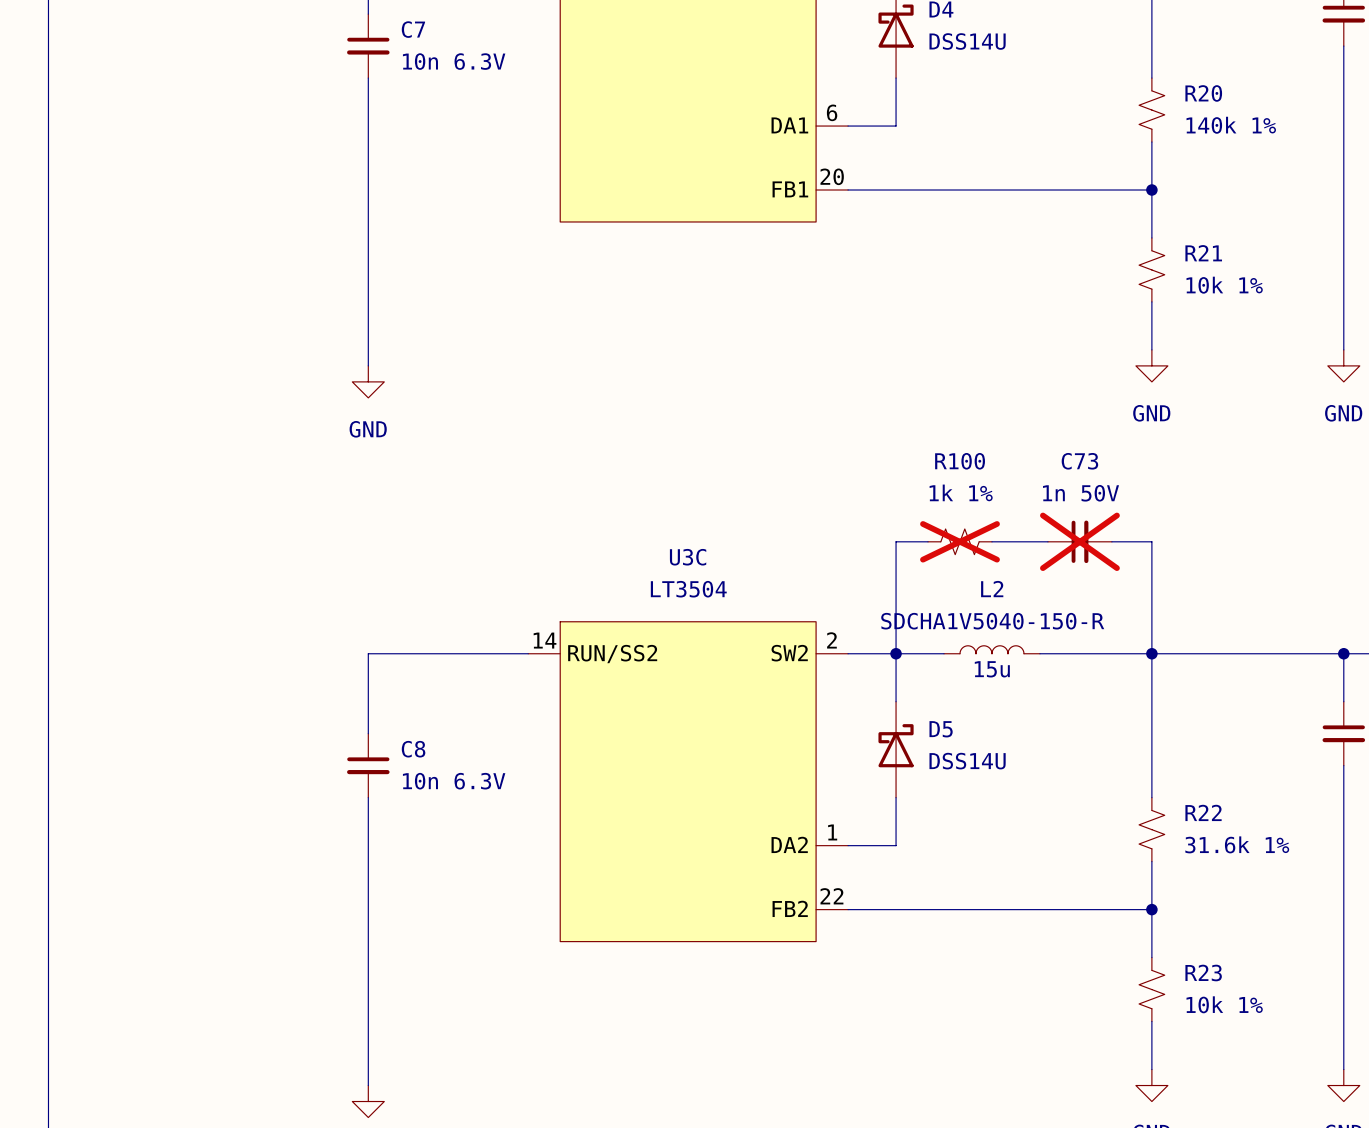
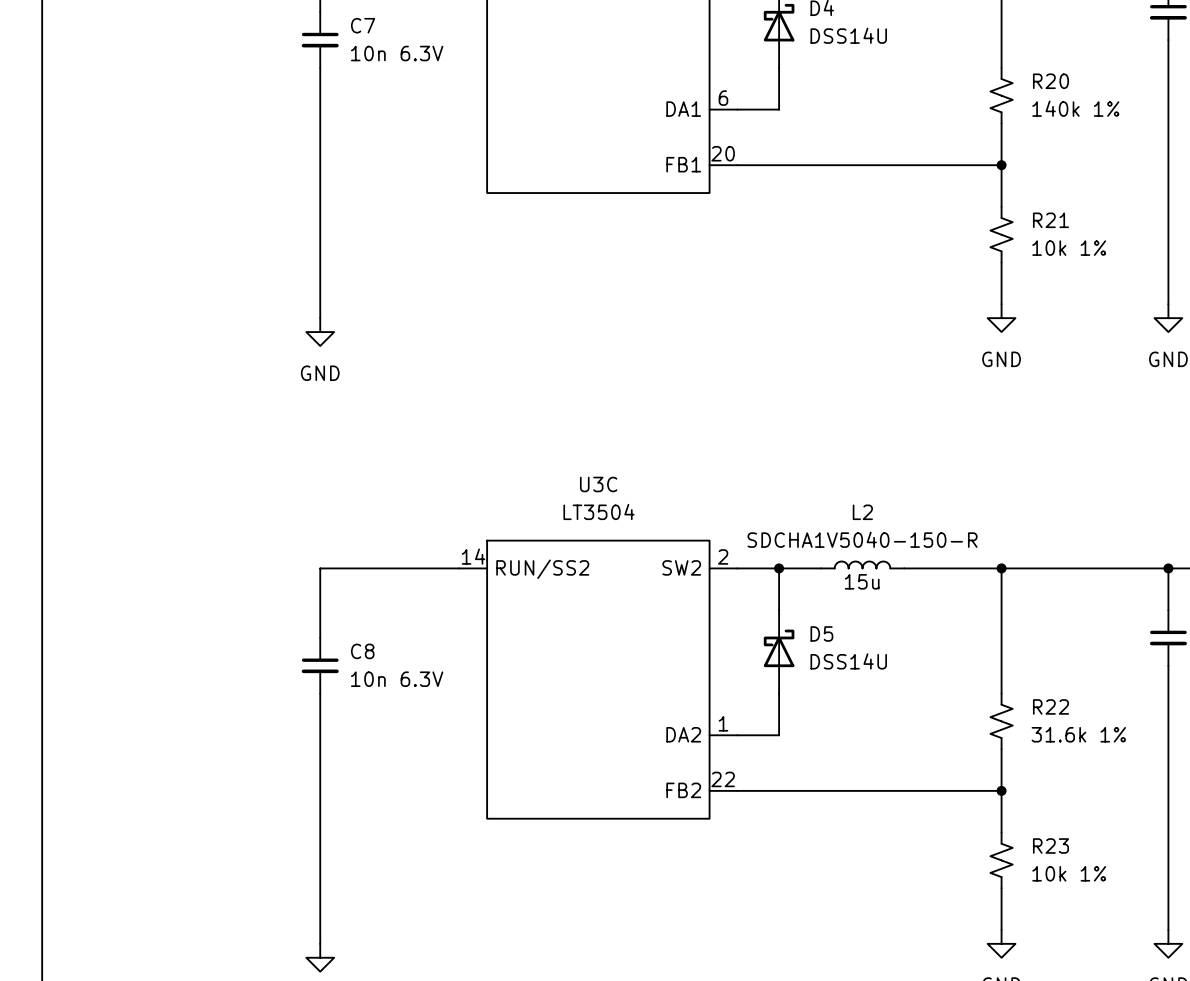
wire: (928, 541) (896, 541) (896, 653) -> none
R100: 1k 1% (960, 541) -> none
wire: (991, 541) (1047, 541) -> none
C73: 1n 50V (1079, 541) -> none
wire: (1111, 541) (1151, 541) (1151, 653) -> none

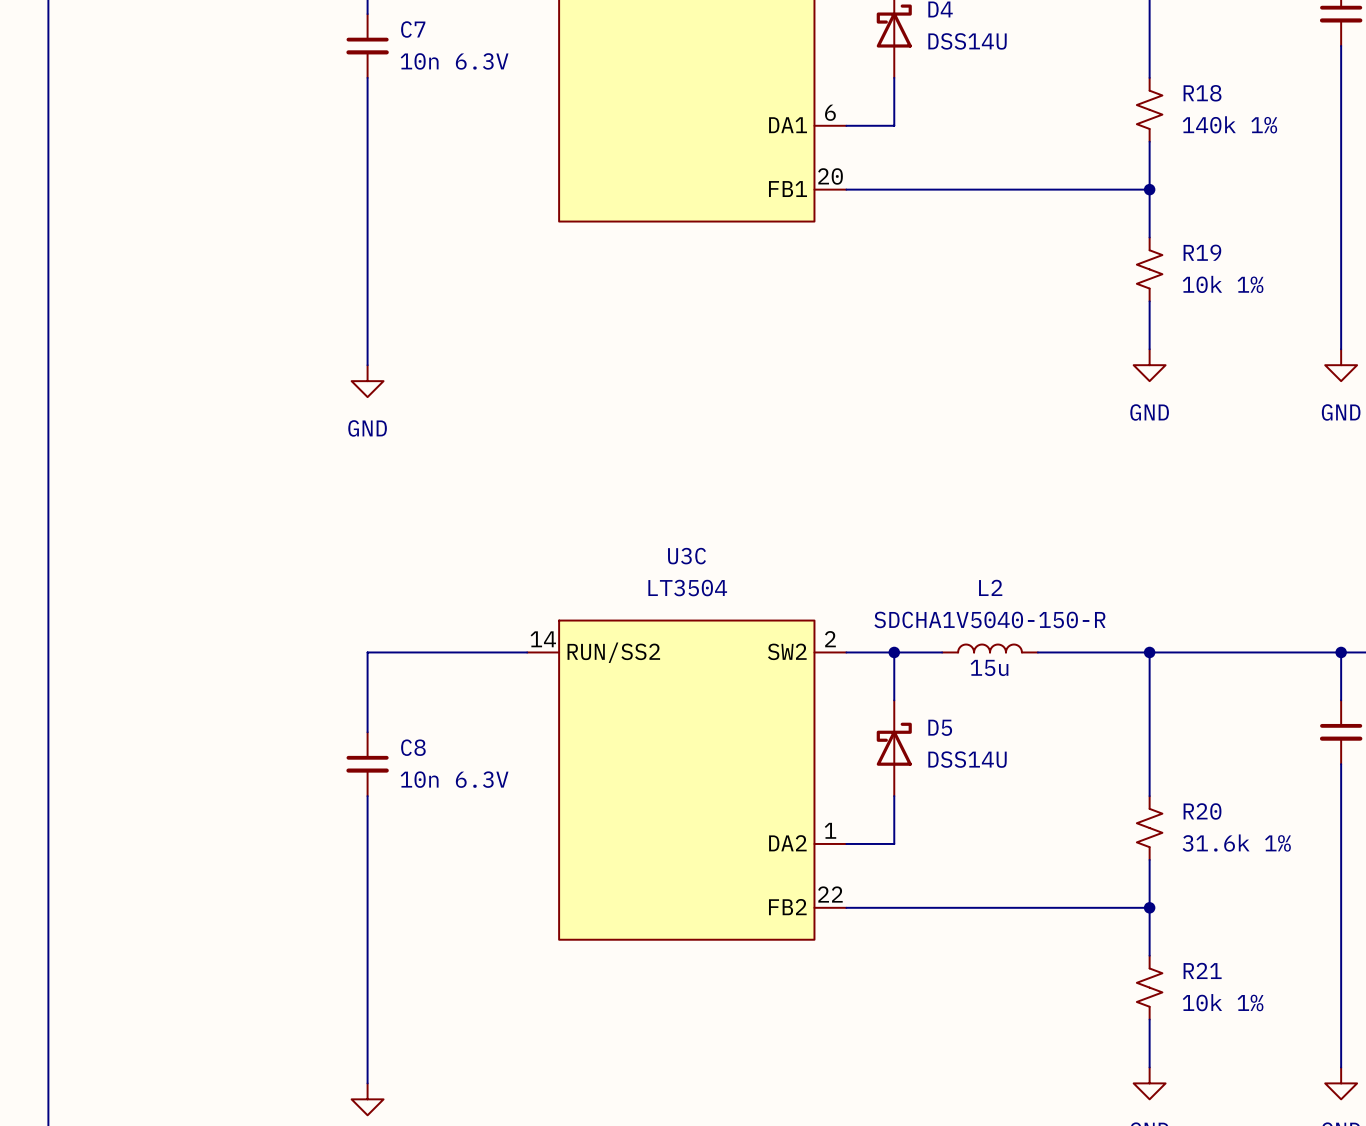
R20 name: R20 (1051, 81) -> R18 (1202, 93)
R21 name: R21 (1051, 220) -> R19 (1202, 252)
R22 name: R22 (1051, 706) -> R20 (1202, 811)
R23 name: R23 (1051, 846) -> R21 (1202, 970)

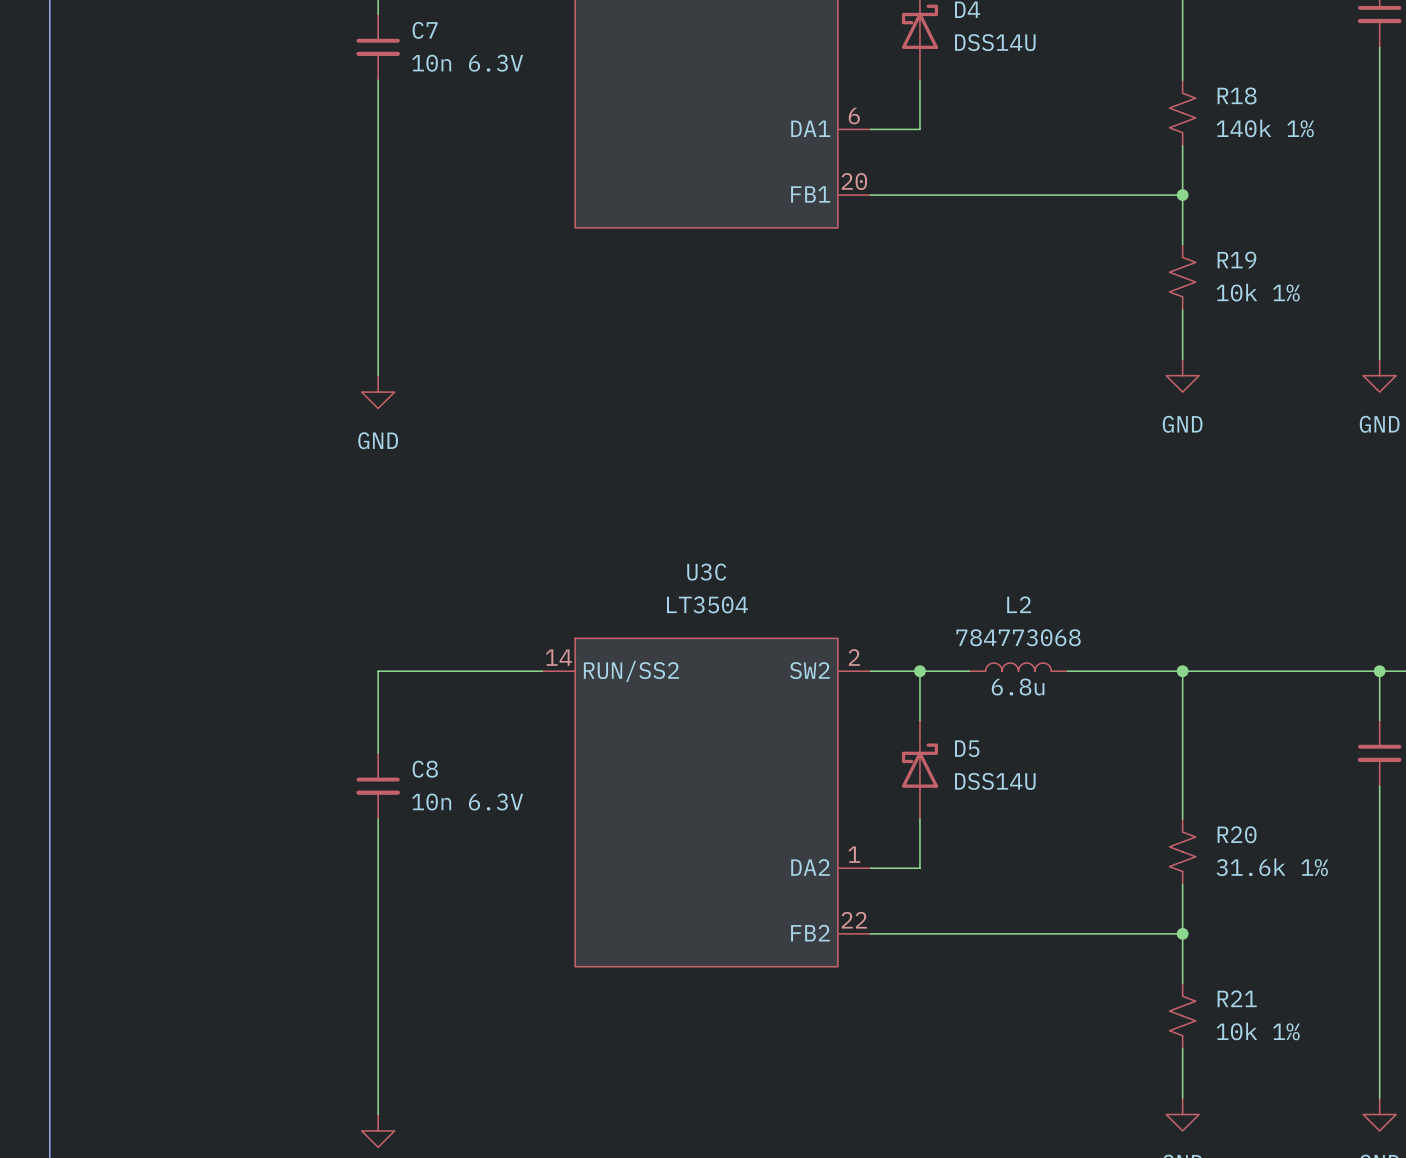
L2 value: SDCHA1V5040-150-R (989, 619) -> 784773068 (1018, 637)
L2 text: 15u (989, 667) -> 6.8u (1018, 687)

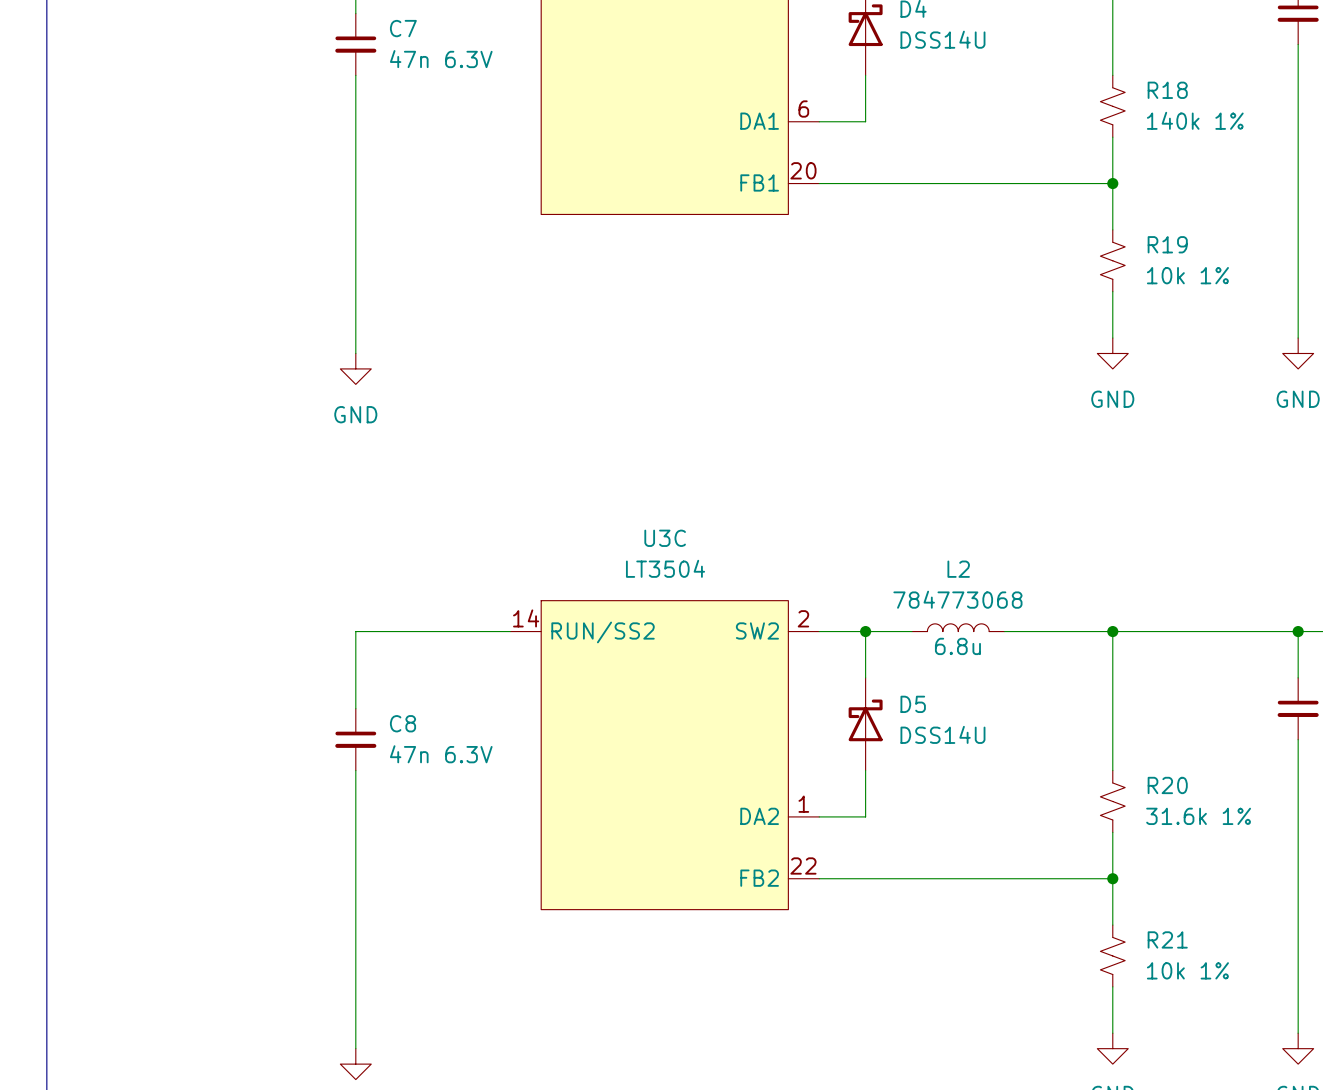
C7 value: 10n 6.3V (467, 63) -> 47n 6.3V (441, 59)
C8 value: 10n 6.3V (467, 802) -> 47n 6.3V (441, 754)

